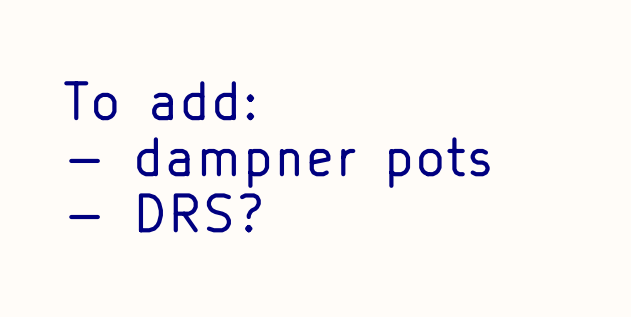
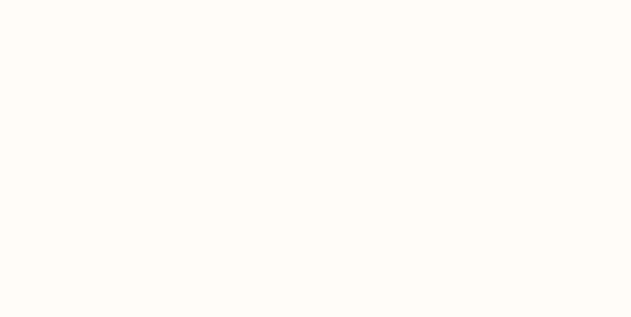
text: To add: (159, 100) -> none
text: - dampner pots (279, 162) -> none
text: - DRS? (165, 212) -> none

